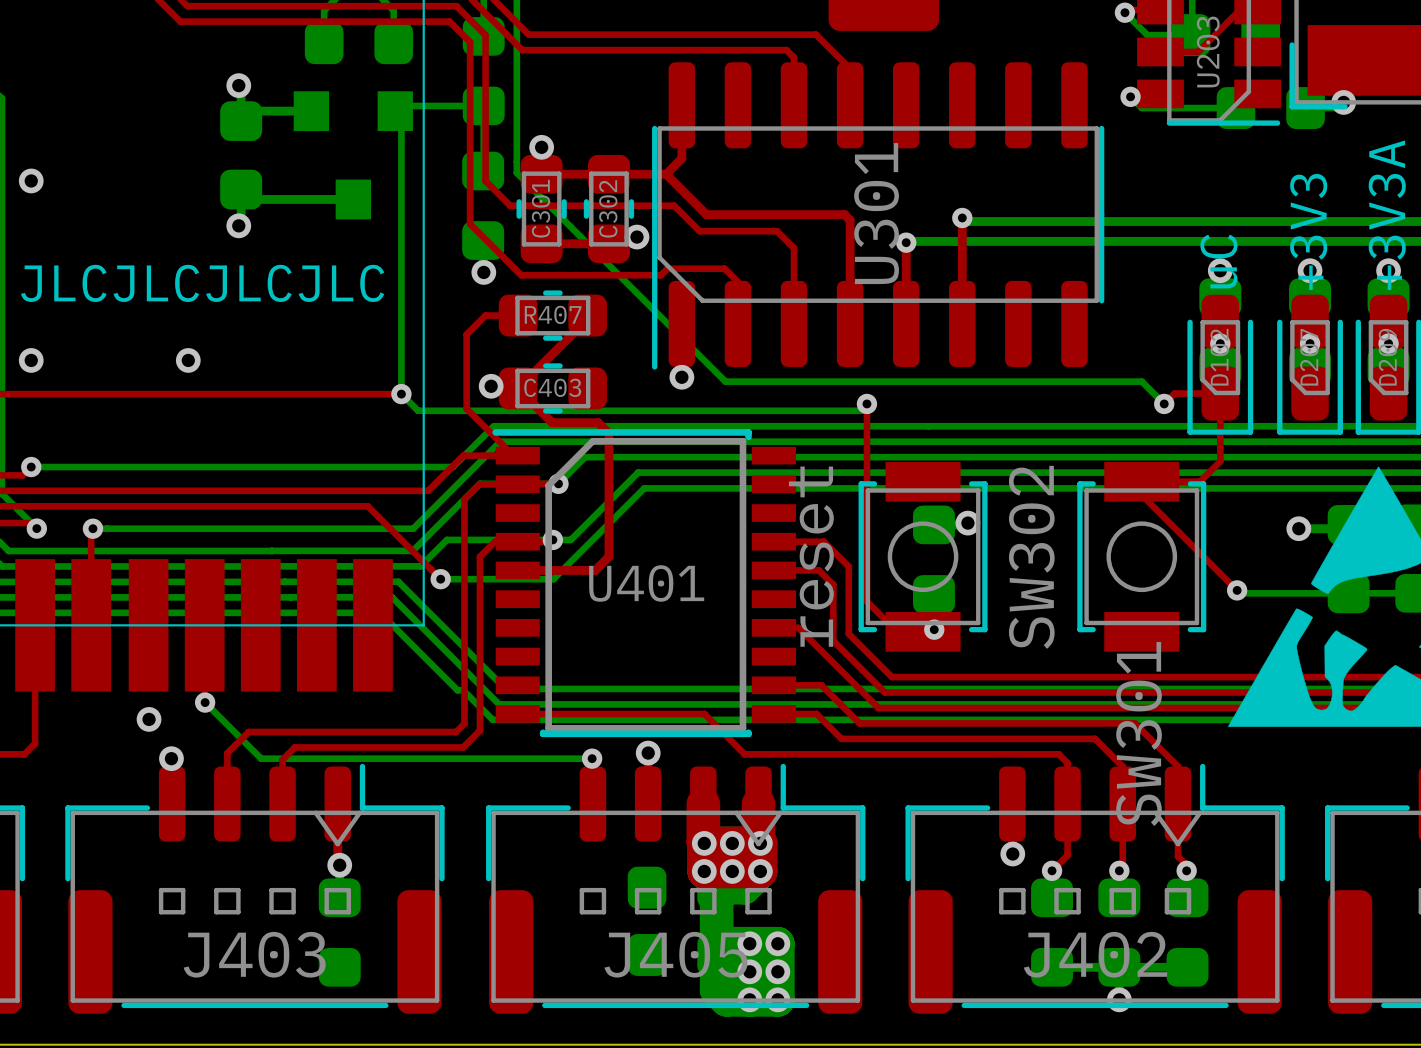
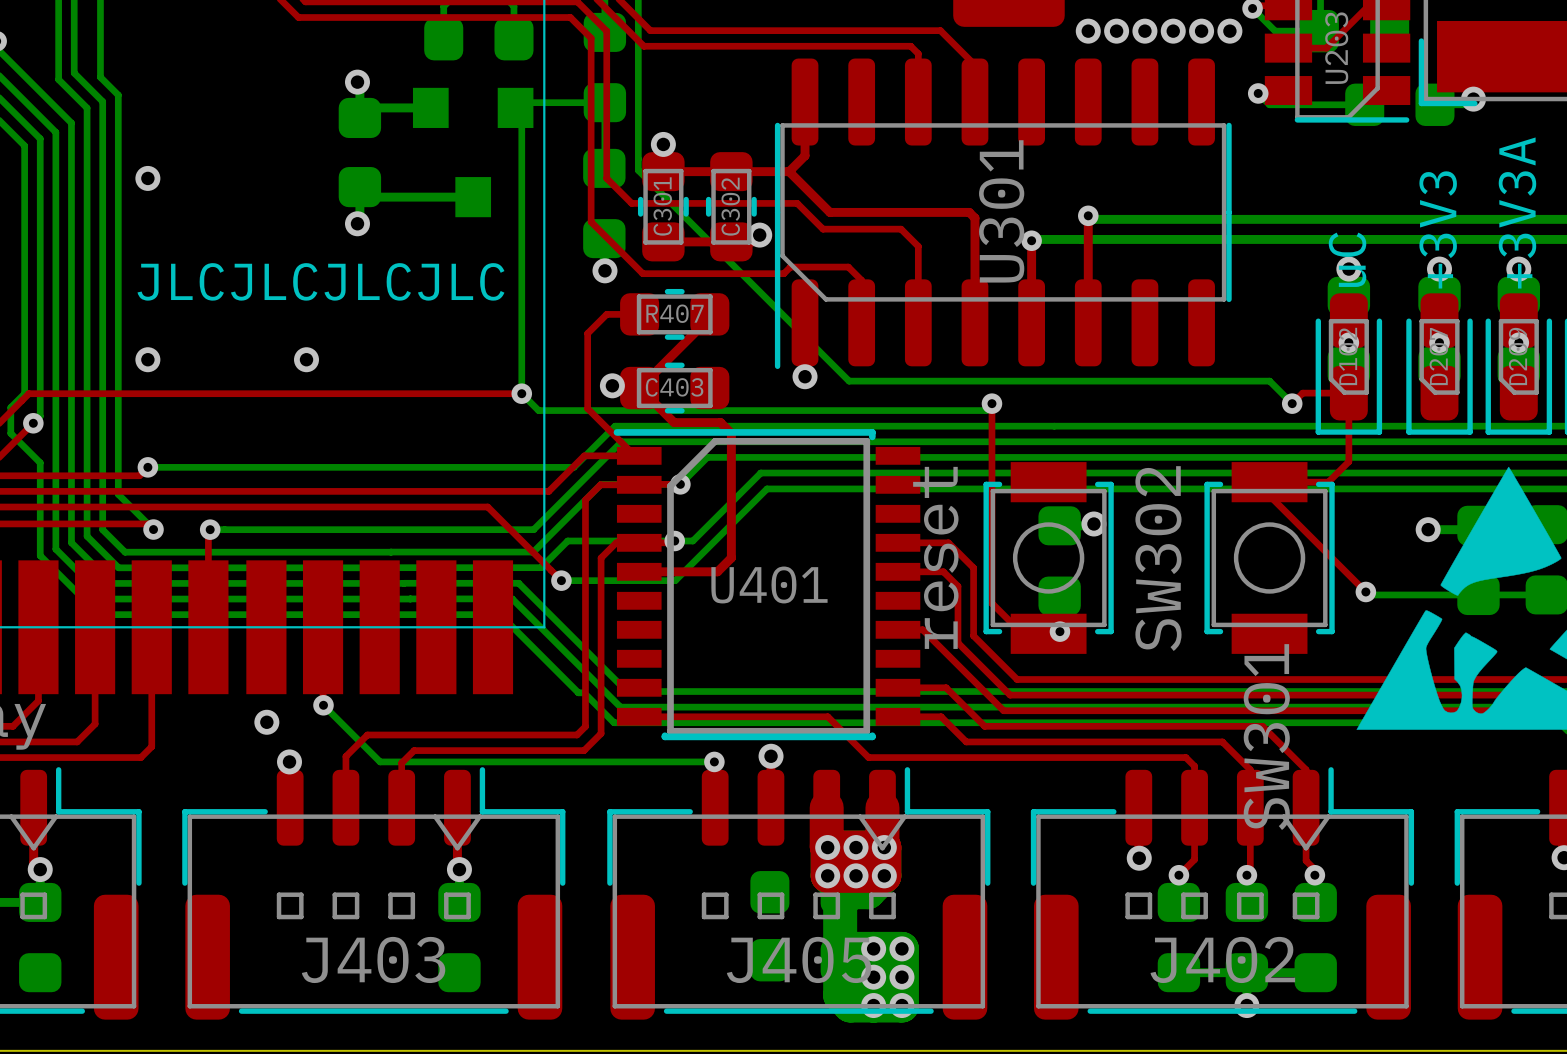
via: none -> (1088, 31)
via: none -> (1116, 31)
via: none -> (1144, 31)
via: none -> (1173, 31)
via: none -> (1201, 31)
via: none -> (1229, 31)

